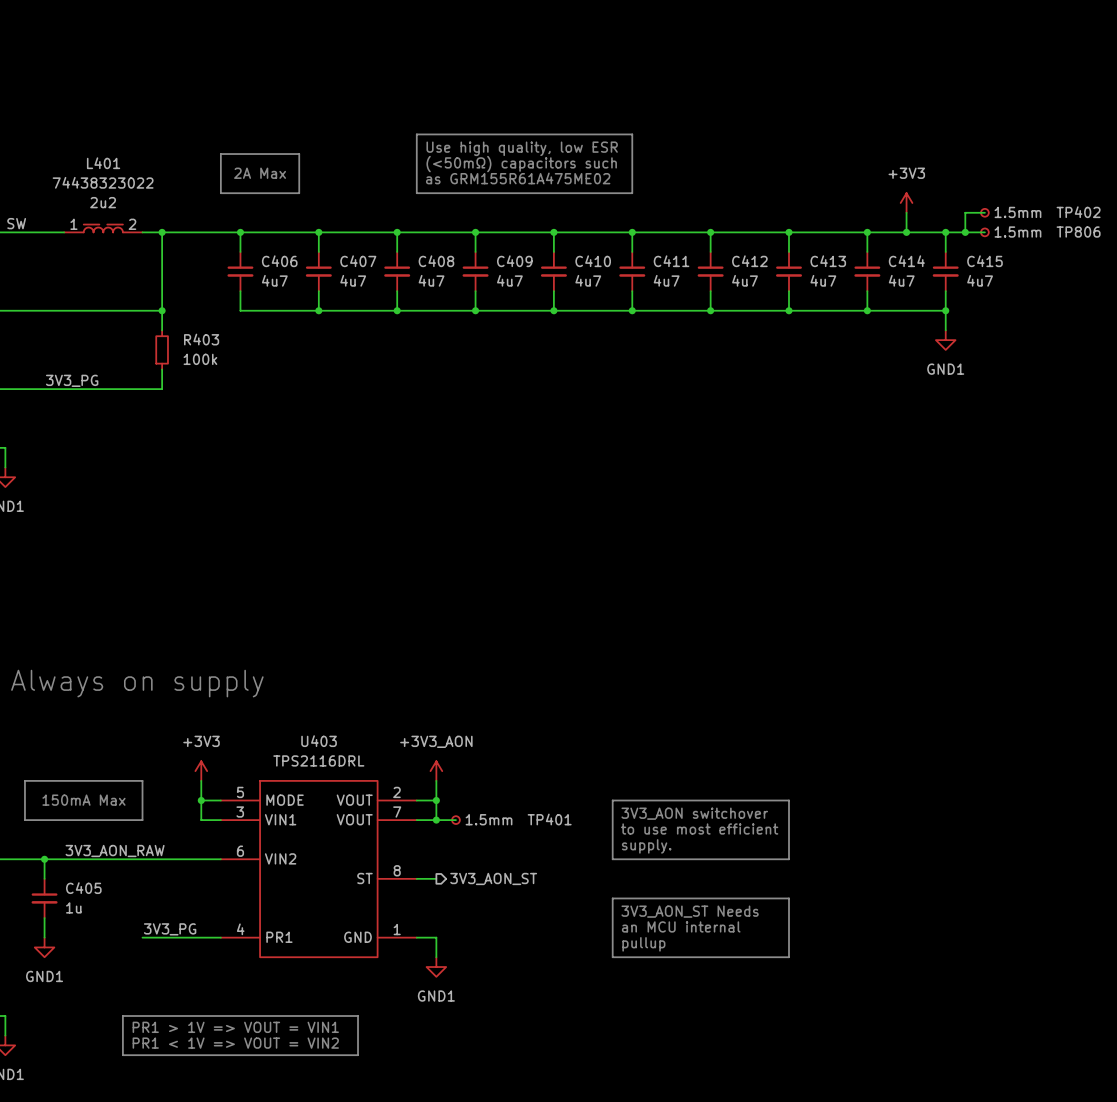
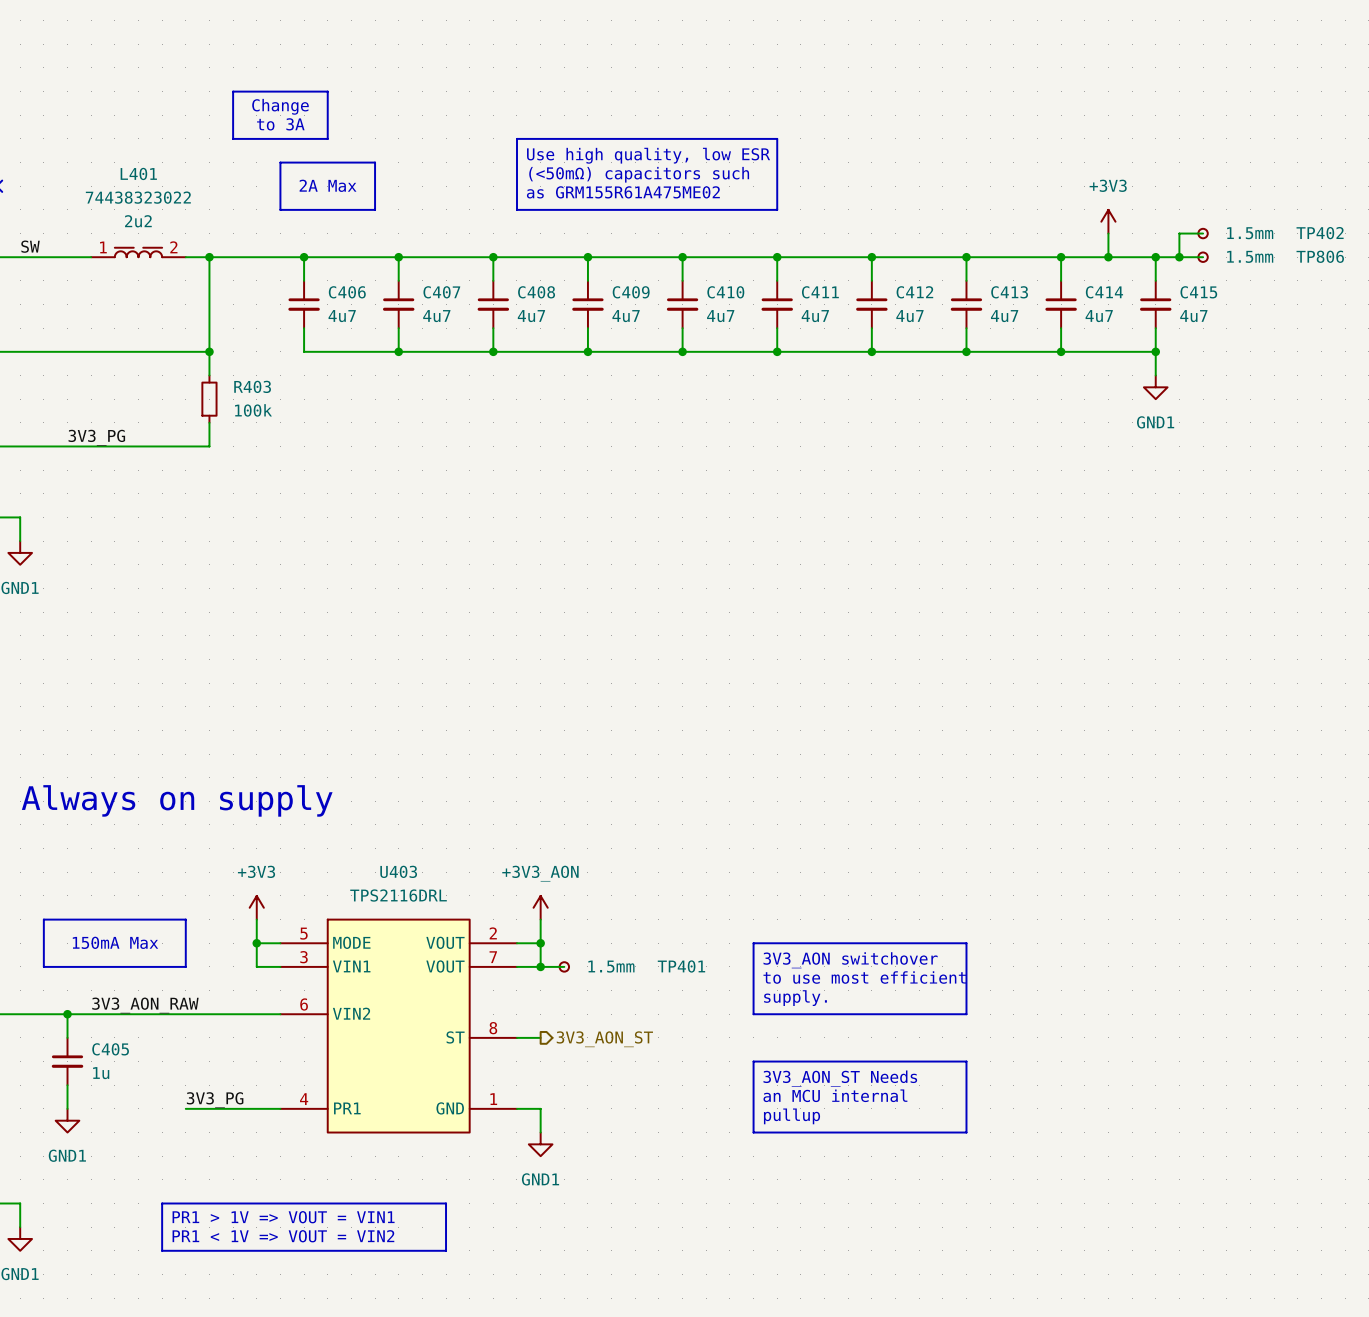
line: none -> (233, 91) (327, 91) (327, 138) (233, 138) (233, 91)
text: none -> Change (280, 106)
text: none -> to 3A (280, 124)

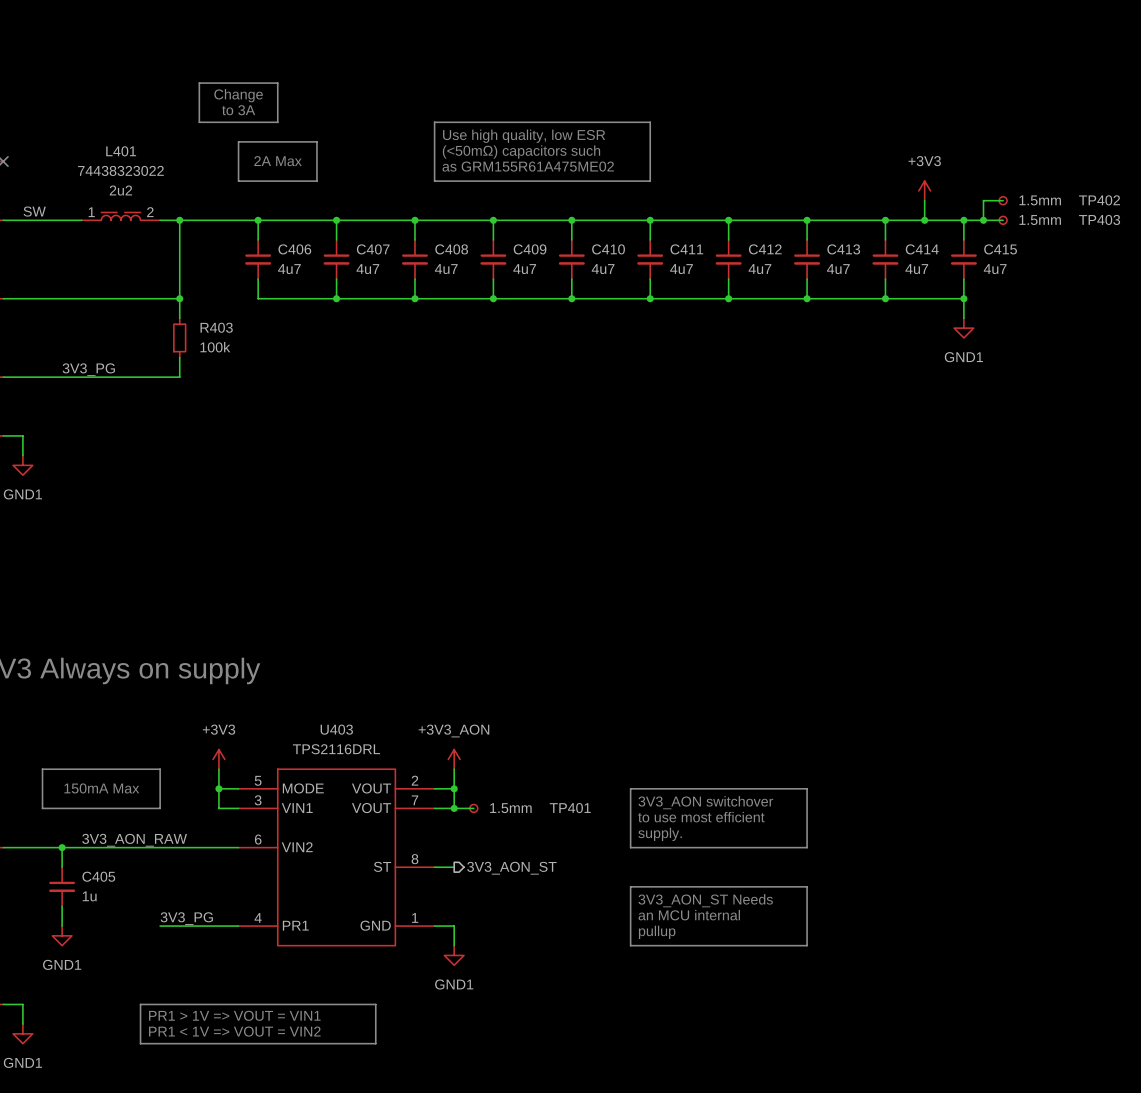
TP806 name: TP806 (1320, 256) -> TP403 (1099, 219)

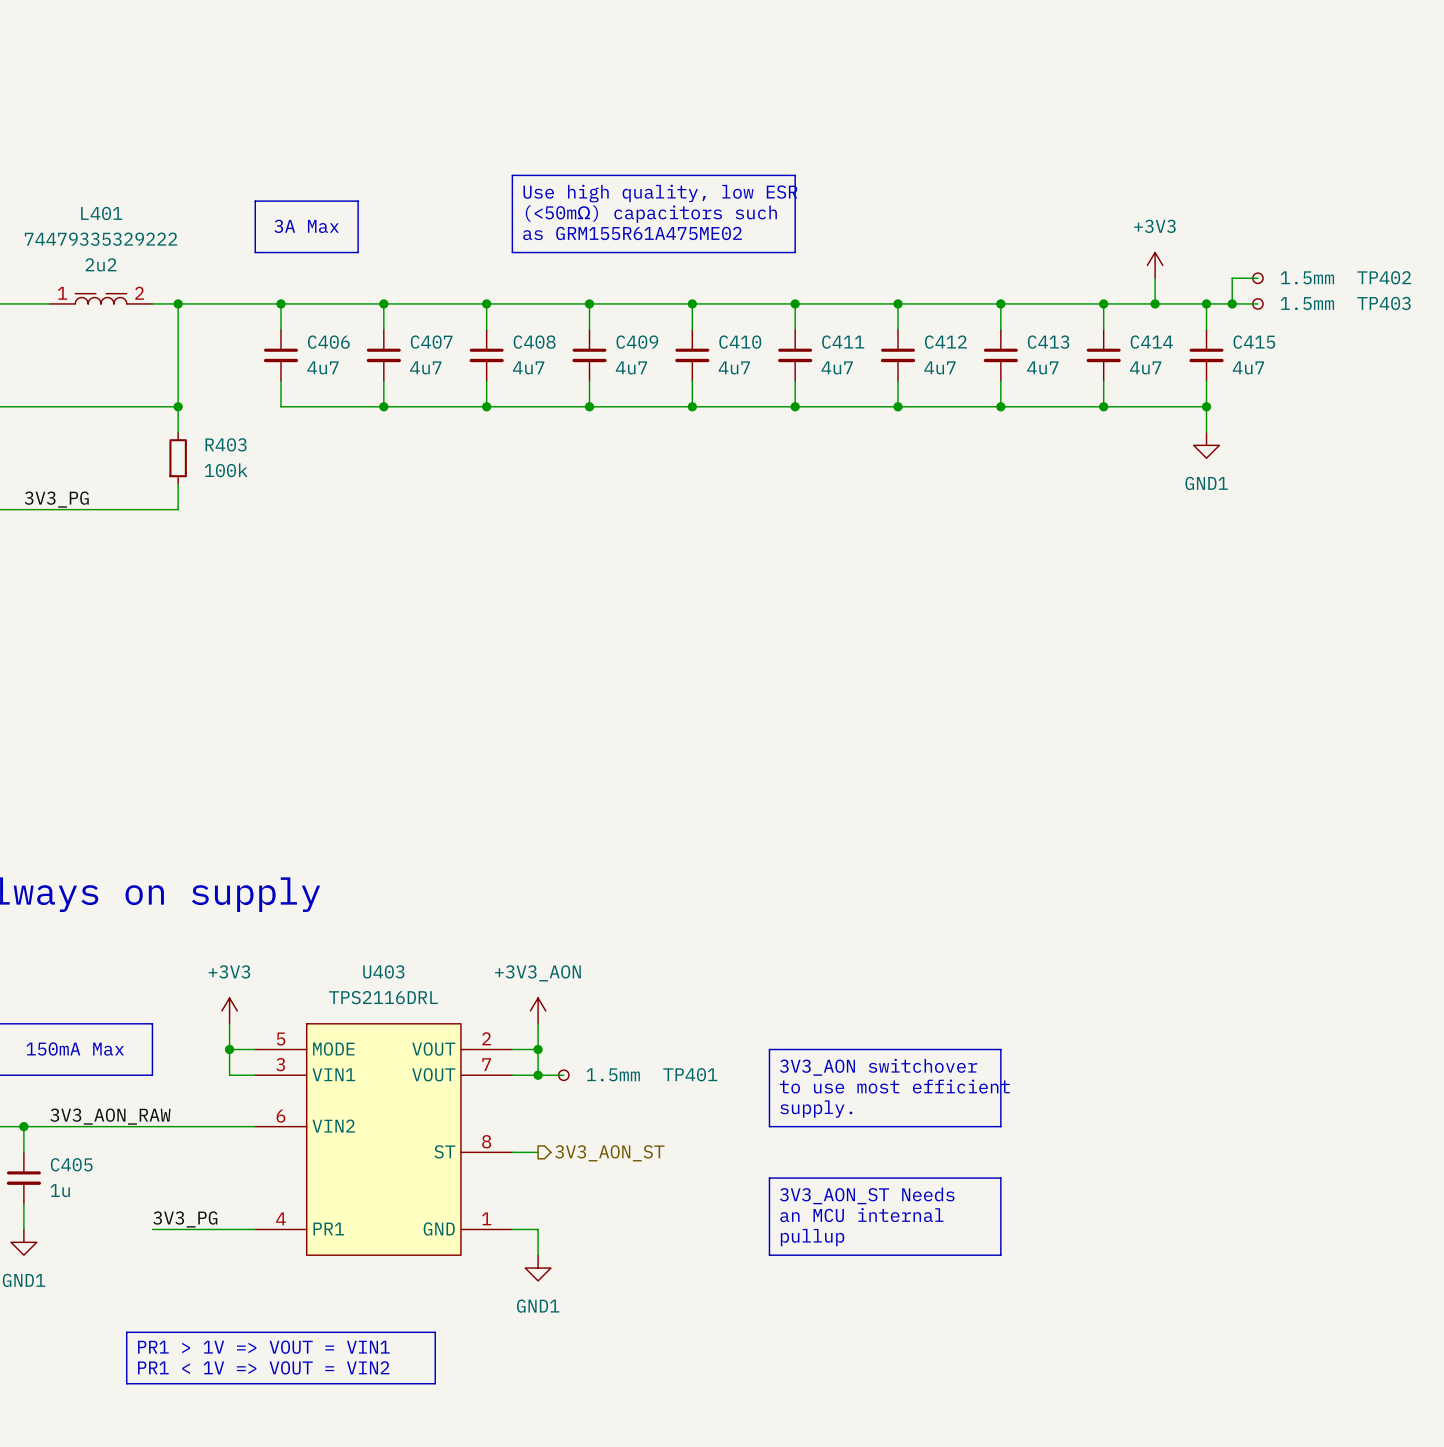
line: (199, 83) (277, 83) (277, 122) (199, 122) (199, 83) -> none
text: Change (238, 95) -> none
text: to 3A (238, 110) -> none
text: 2A Max (278, 161) -> 3A Max (306, 226)
L401 value: 74438323022 (120, 170) -> 74479335329222 (101, 239)

